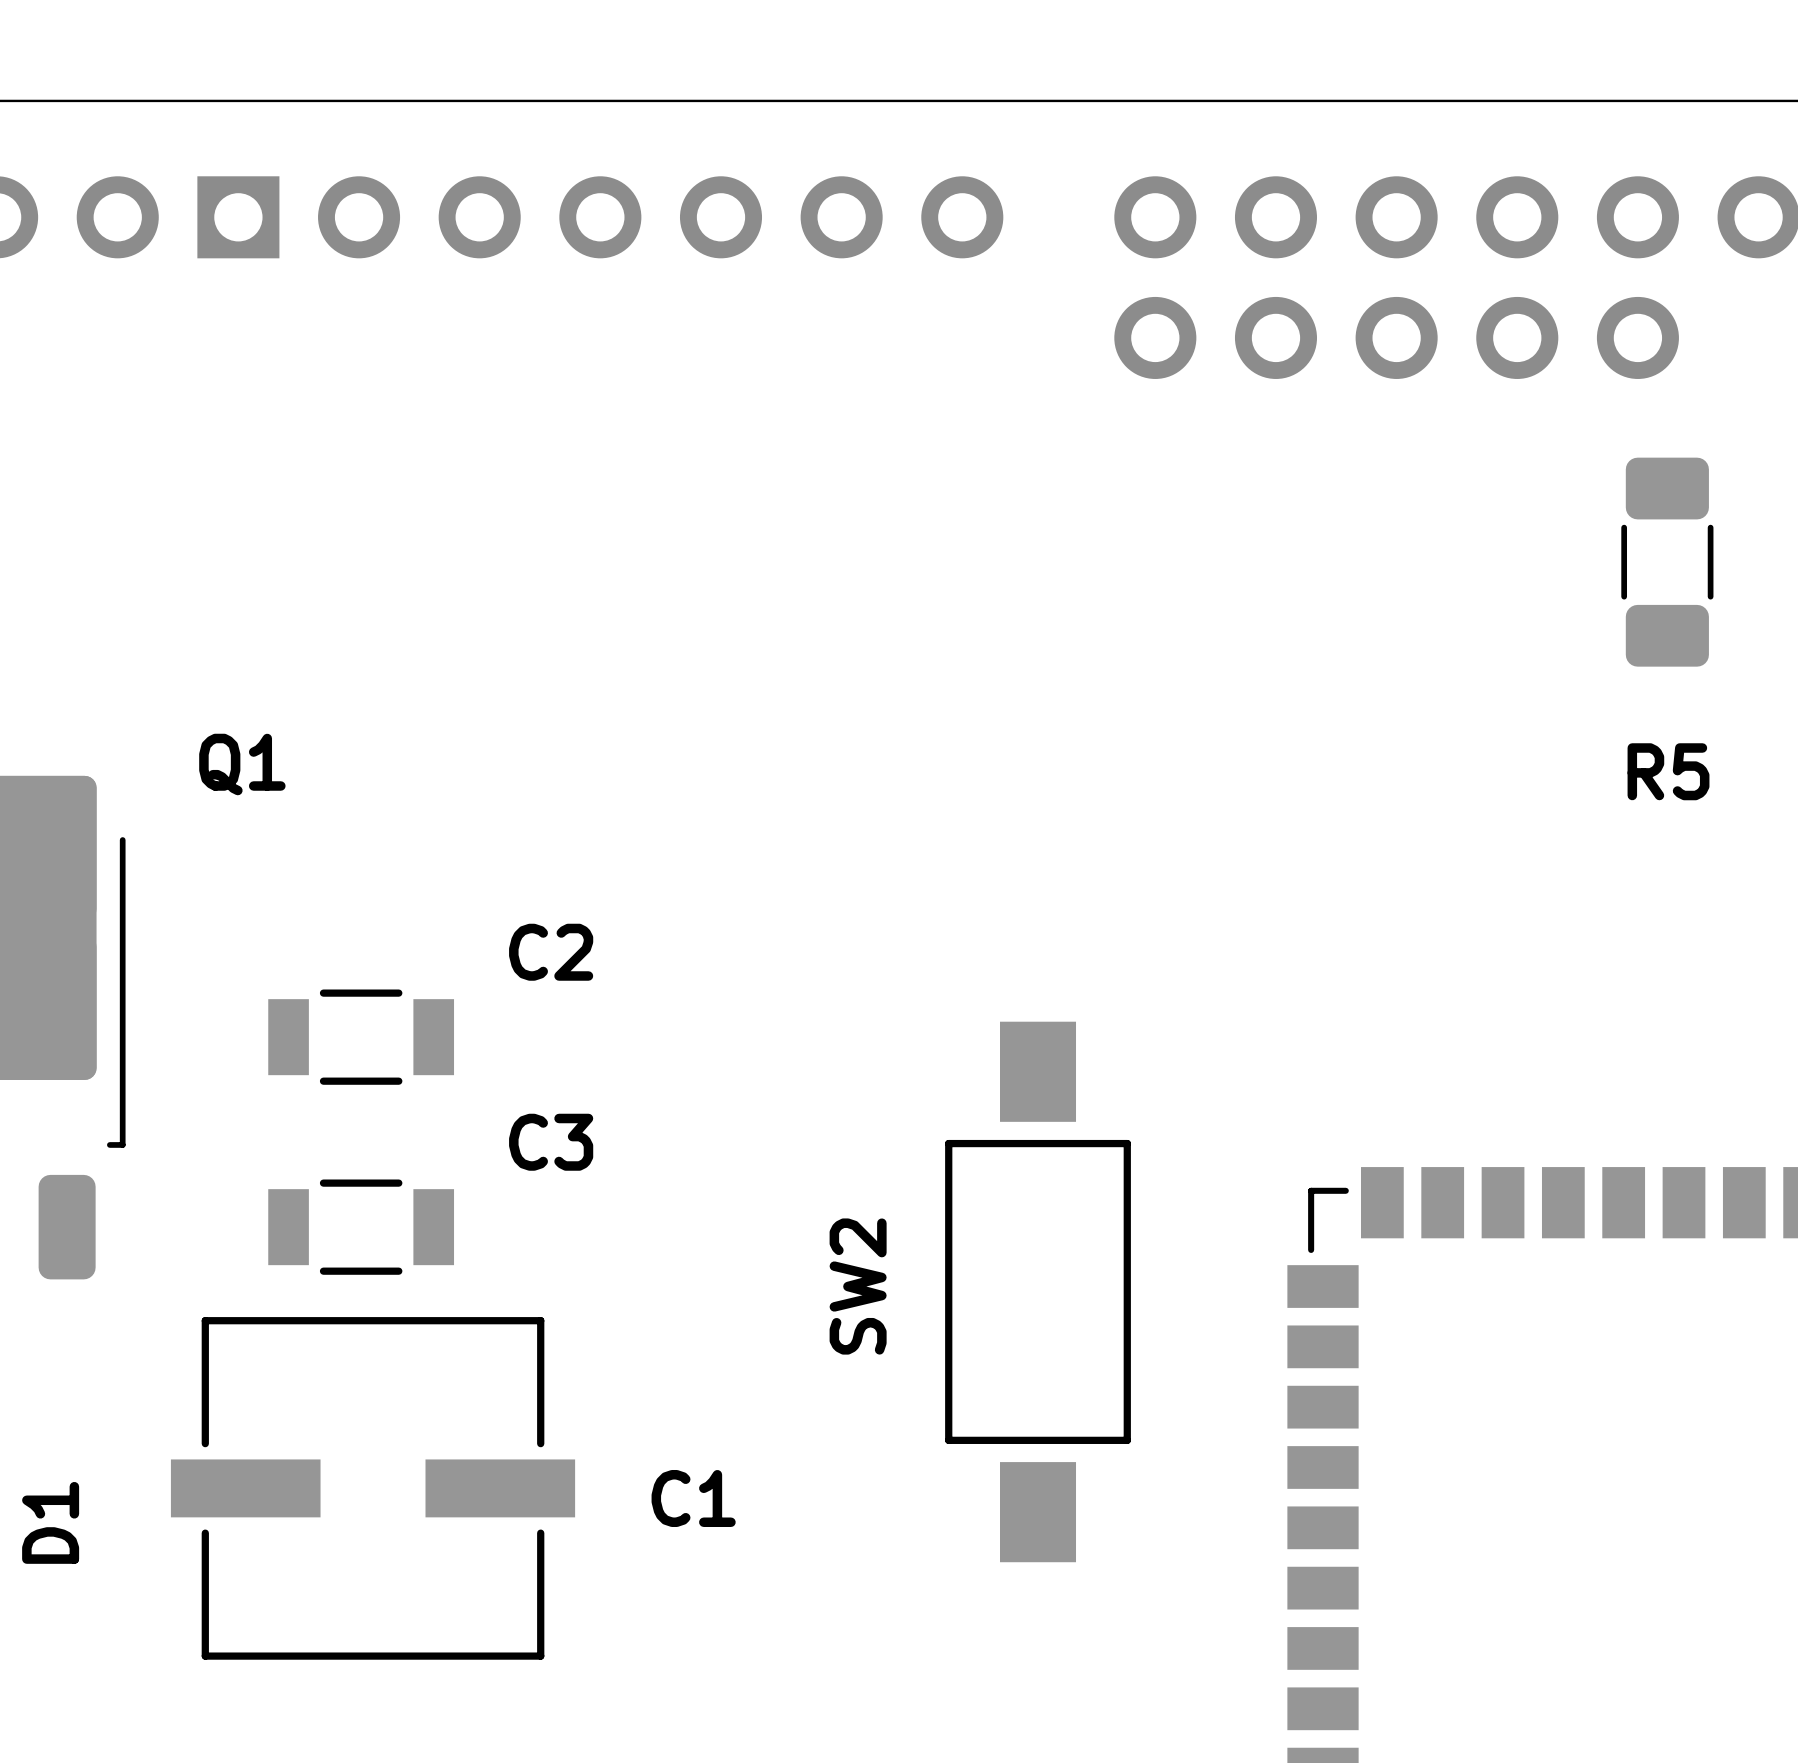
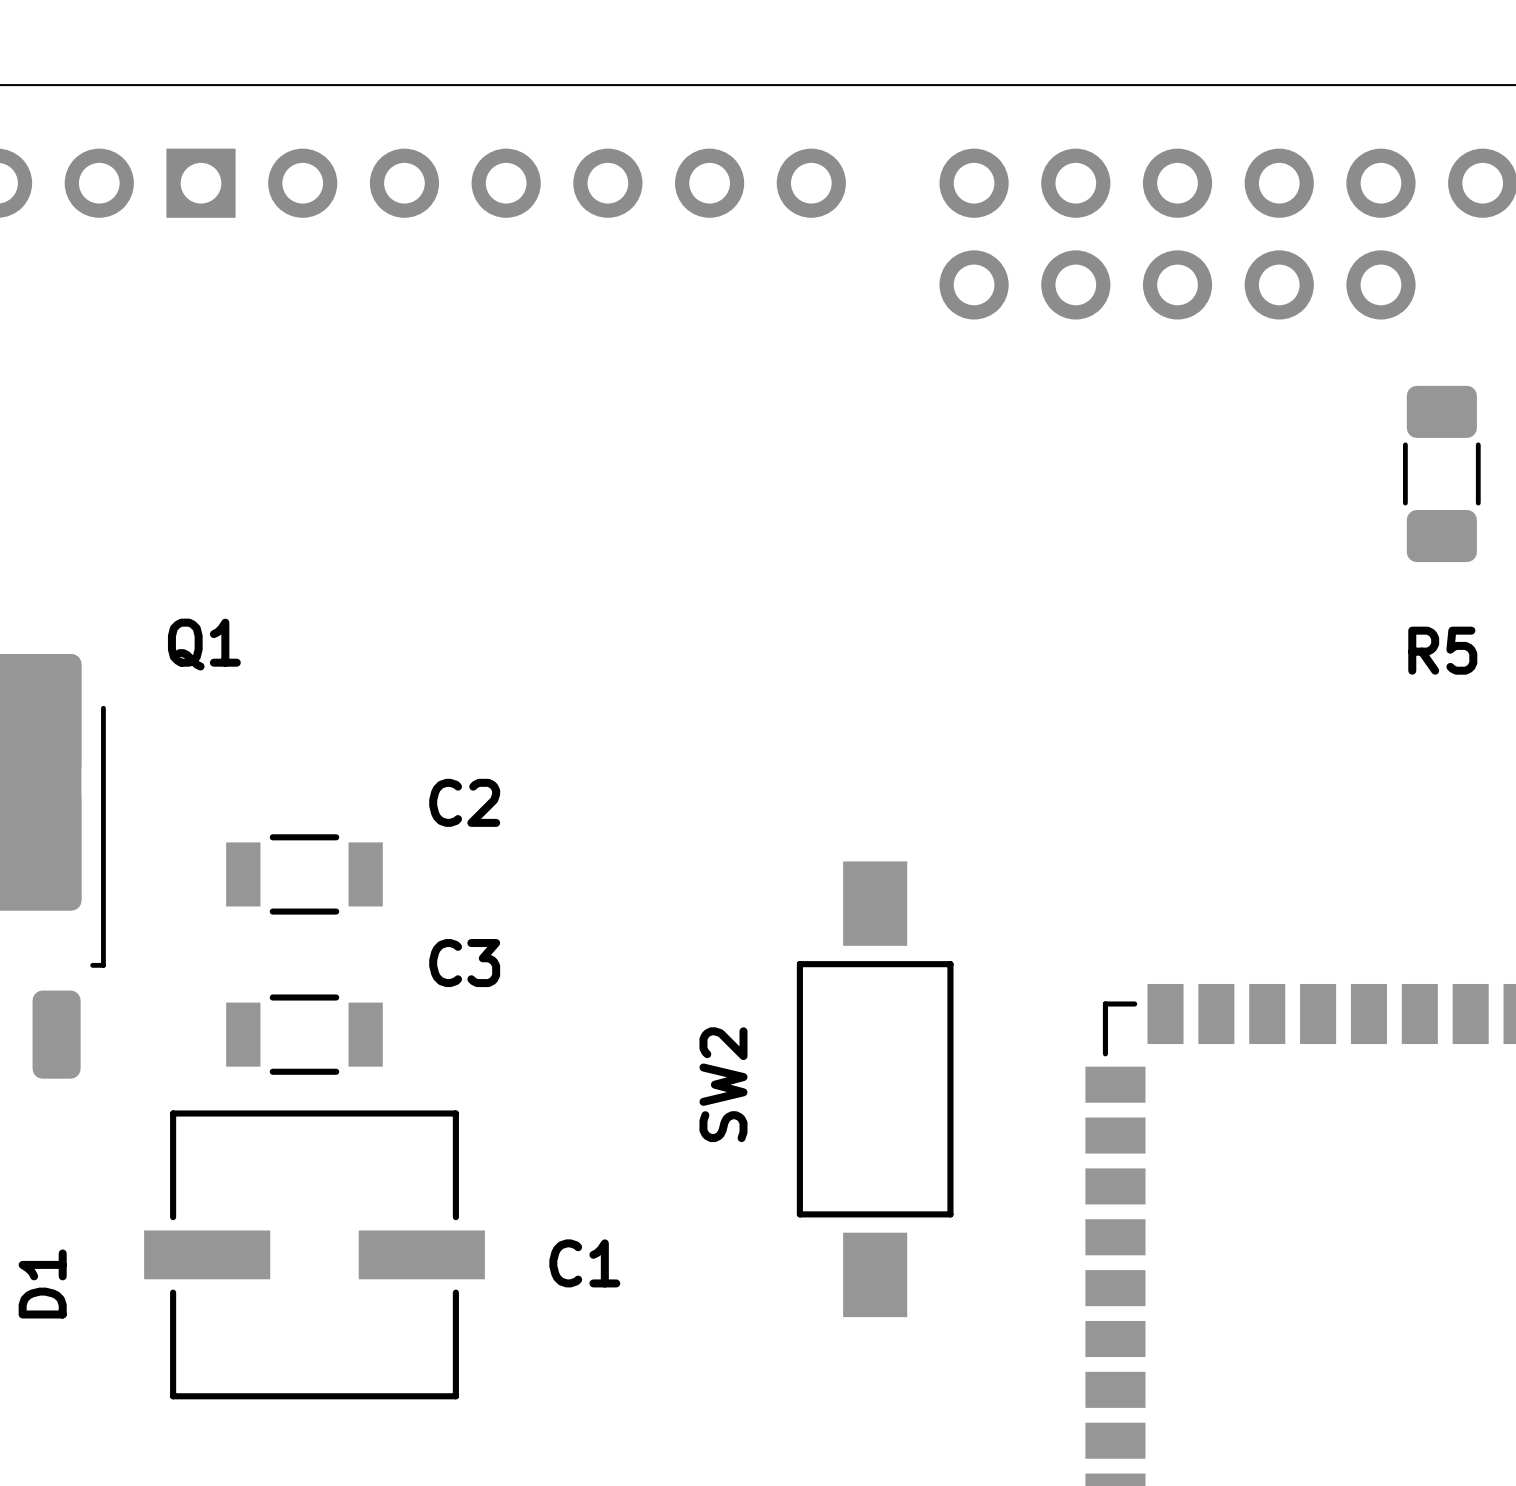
R5 position: (1667, 562) -> (1441, 473)

